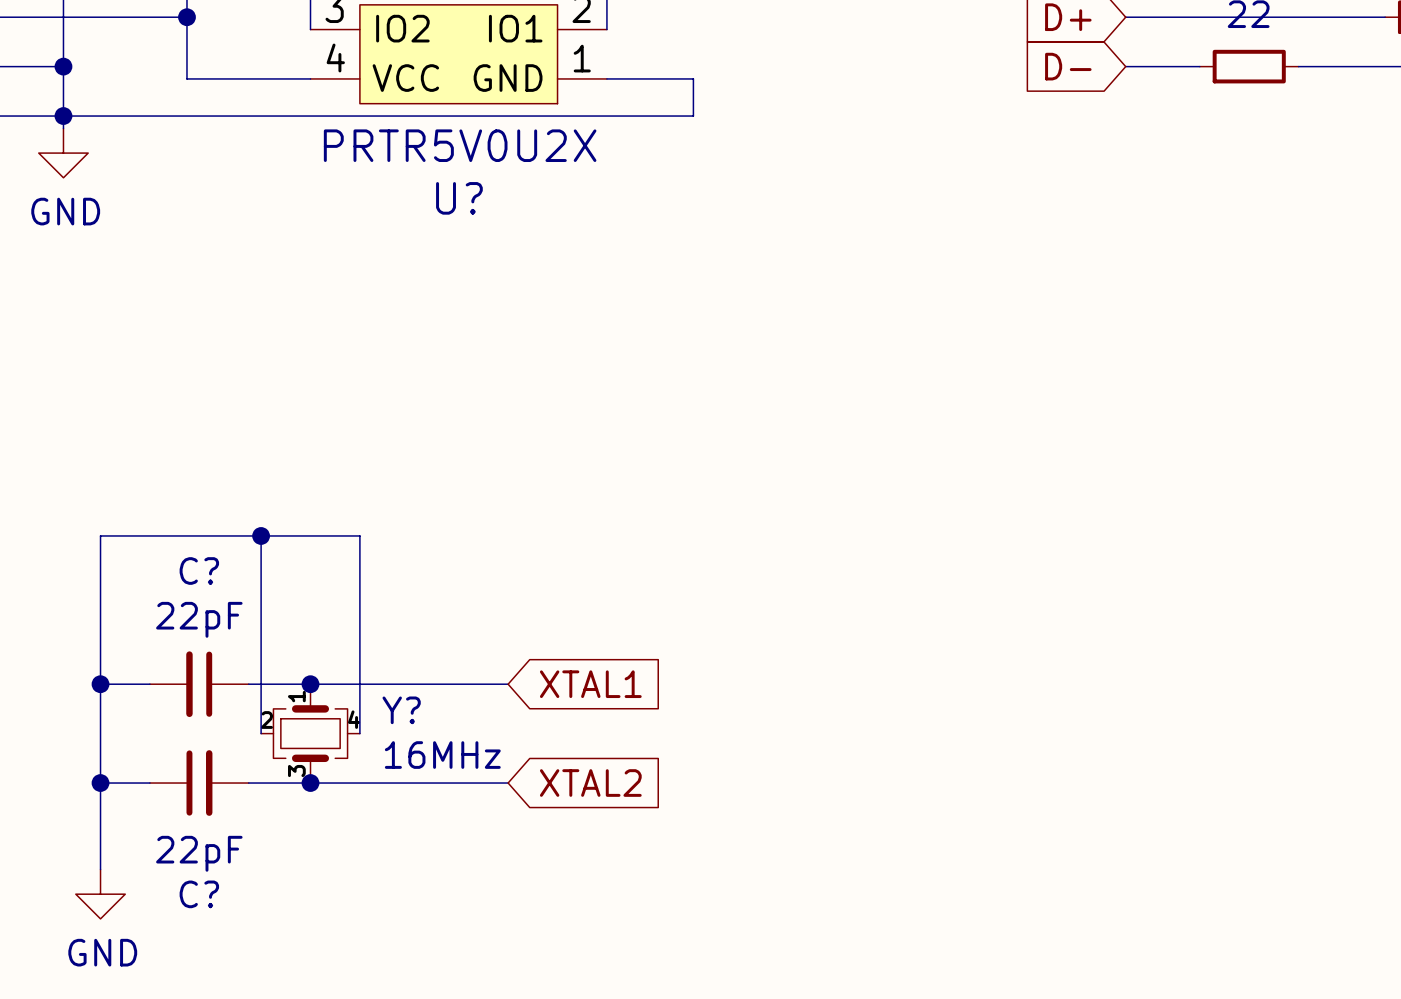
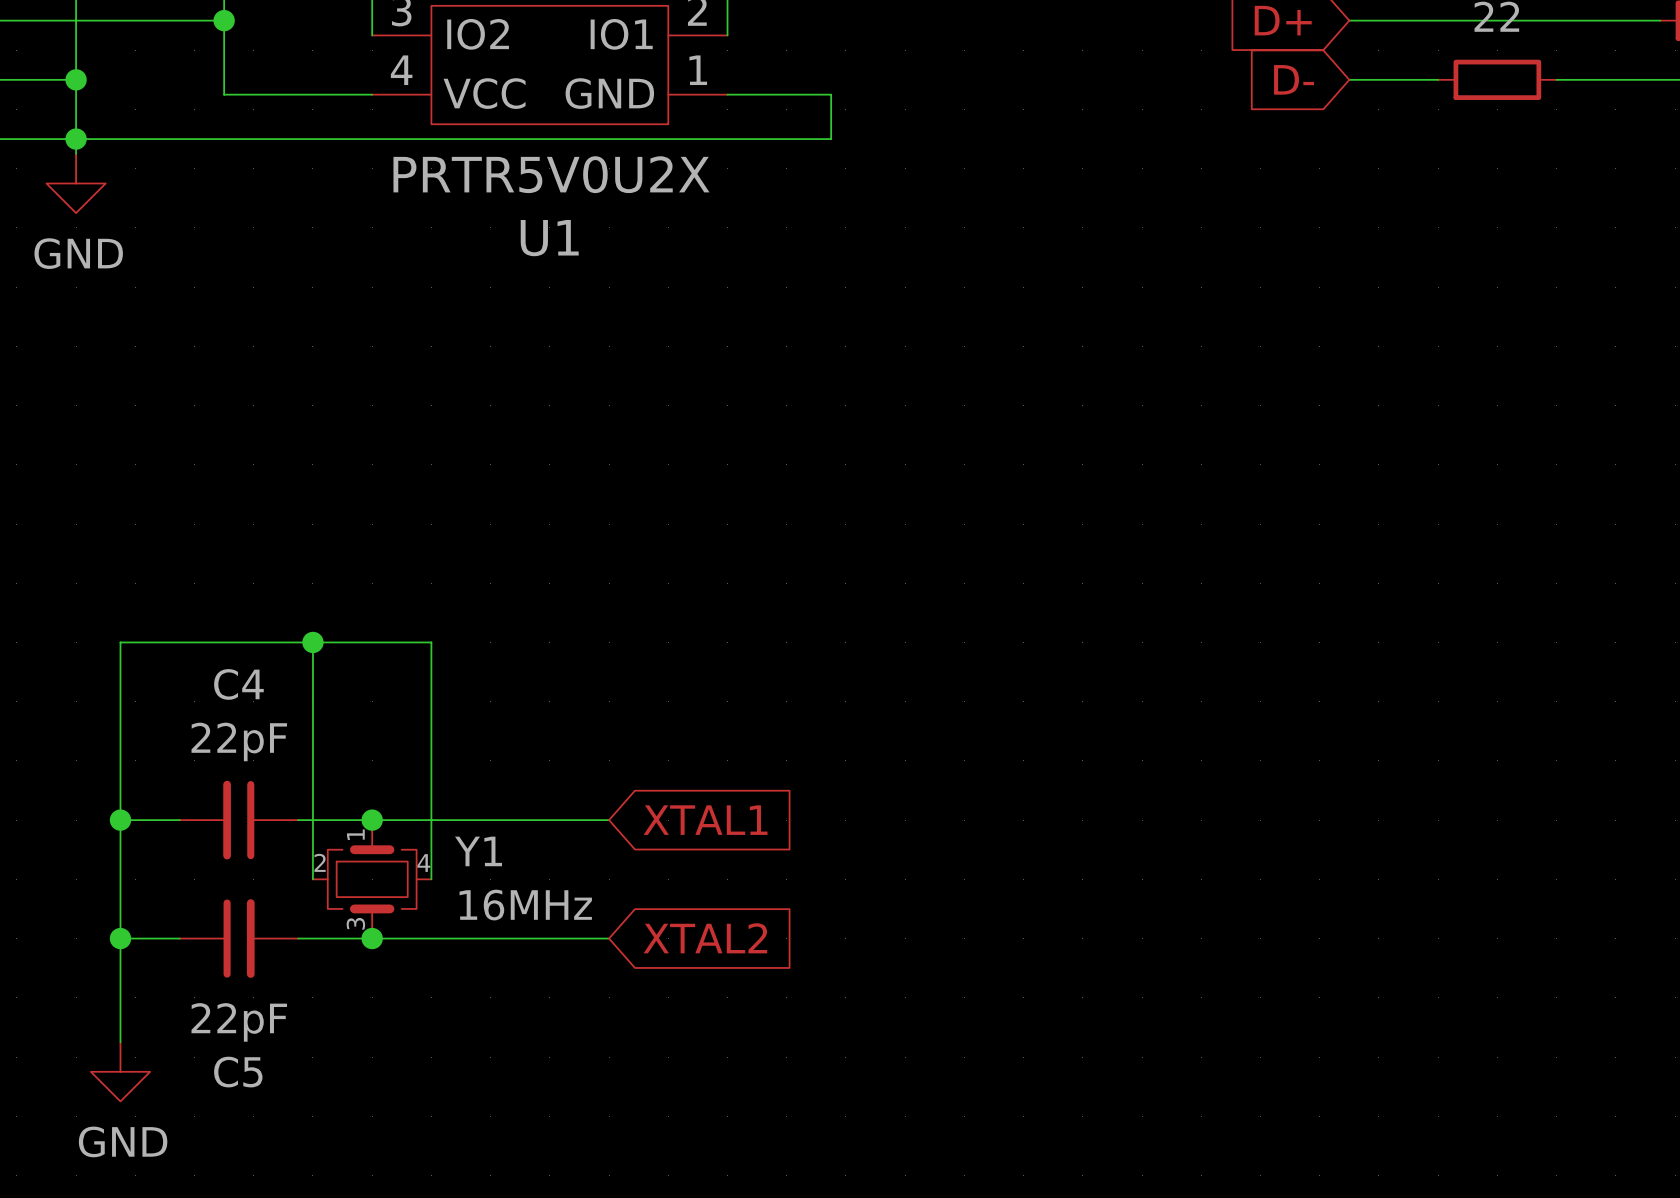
U? name: U? (459, 198) -> U1 (549, 238)
C? name: C? (199, 571) -> C4 (238, 684)
Y? name: Y? (401, 710) -> Y1 (478, 851)
C? name: C? (199, 894) -> C5 (238, 1072)

